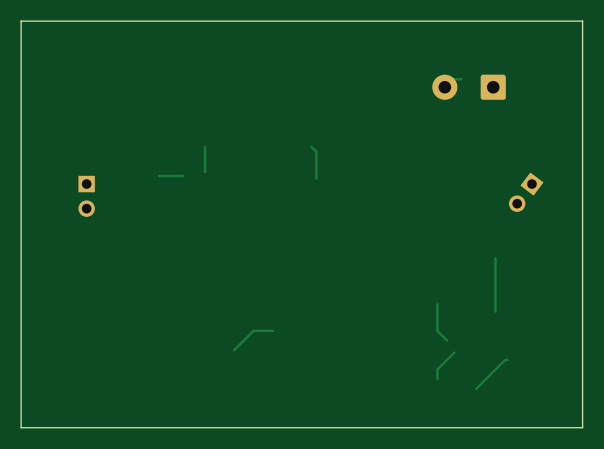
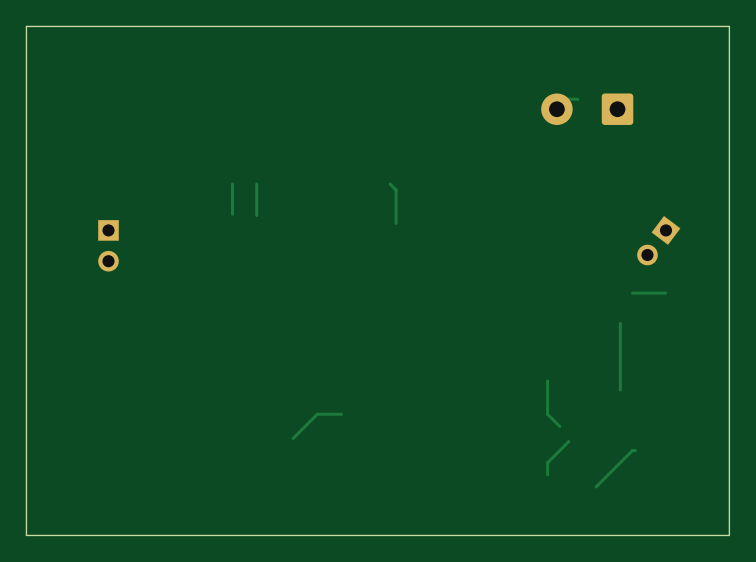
track: none -> (232, 184) (232, 214)
track: (183, 176) (159, 176) -> none
track: none -> (665, 293) (632, 293)

